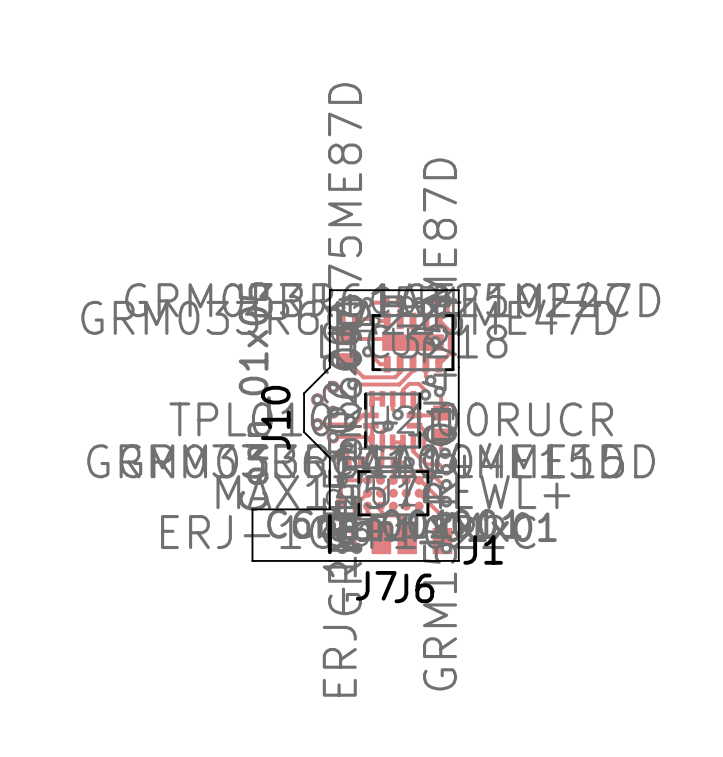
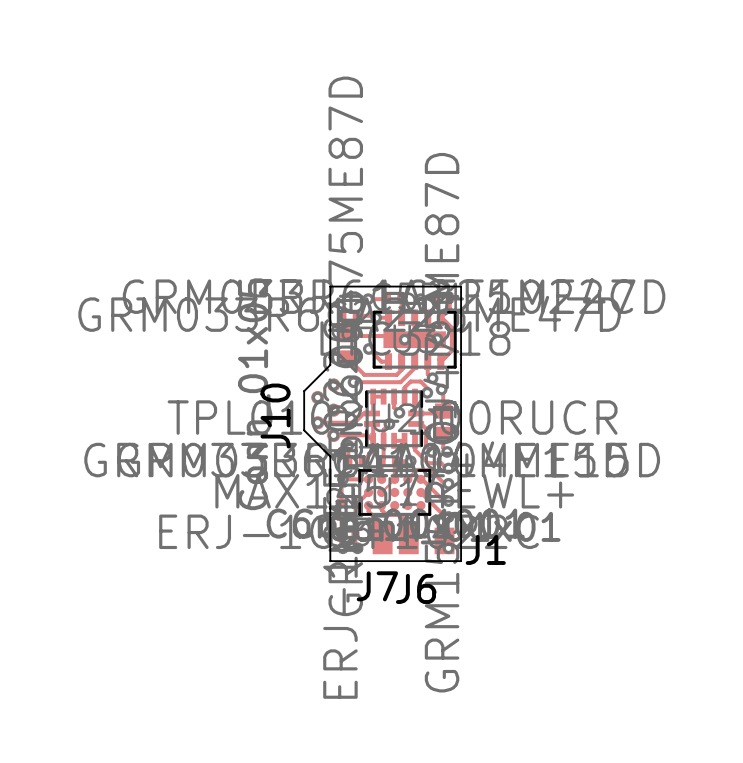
via: none -> (404, 339)
board edge: (329, 509) (252, 509) (252, 560) (329, 560) -> (330, 508) (330, 561)
line: (329, 516) (329, 552) -> none

